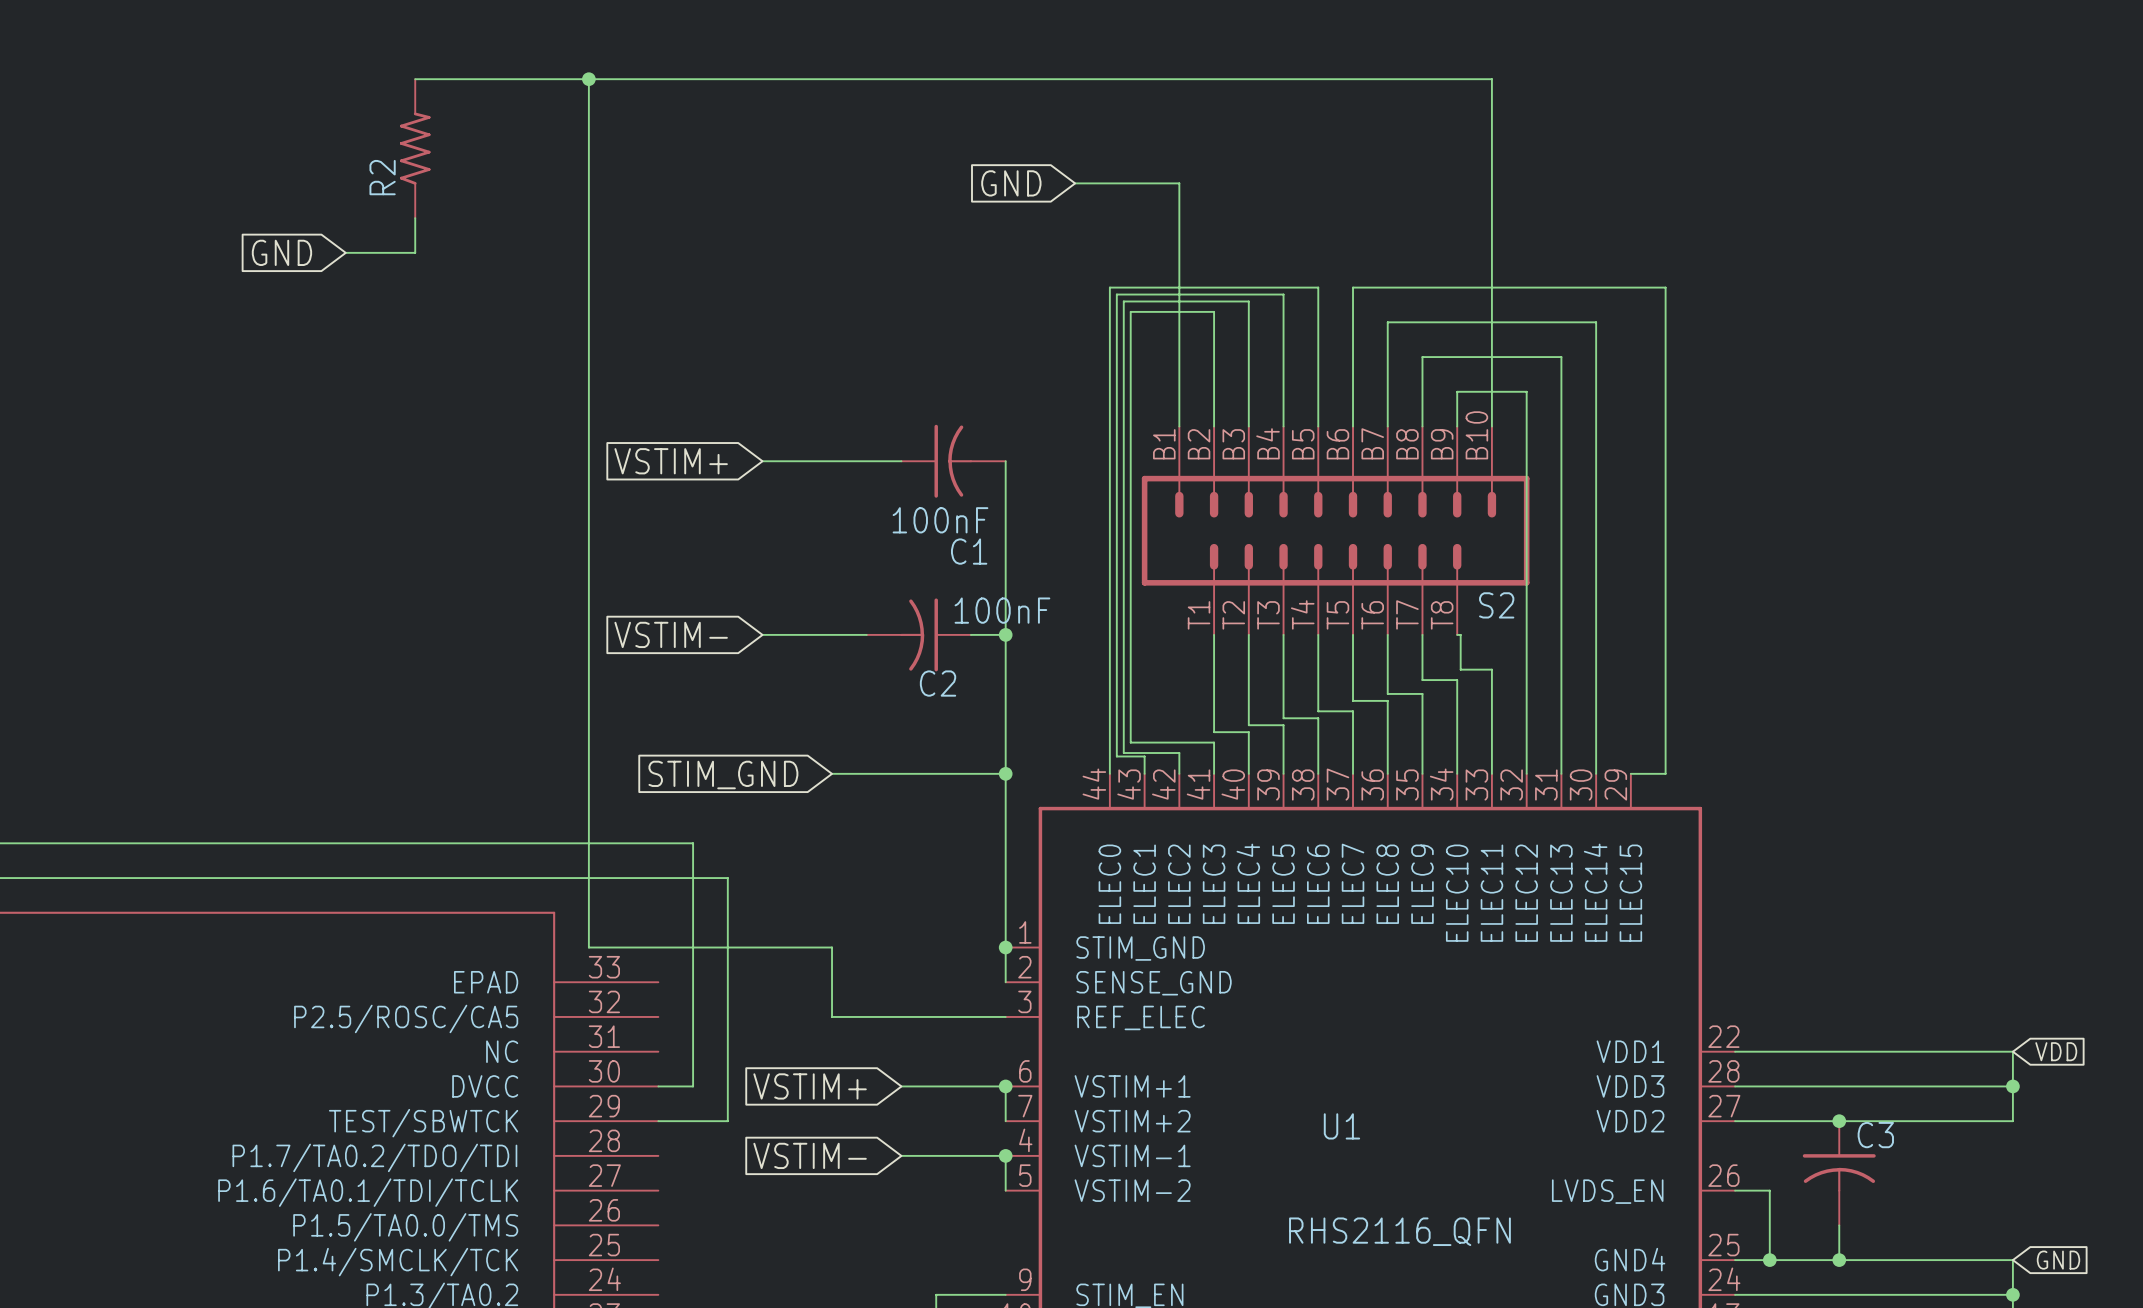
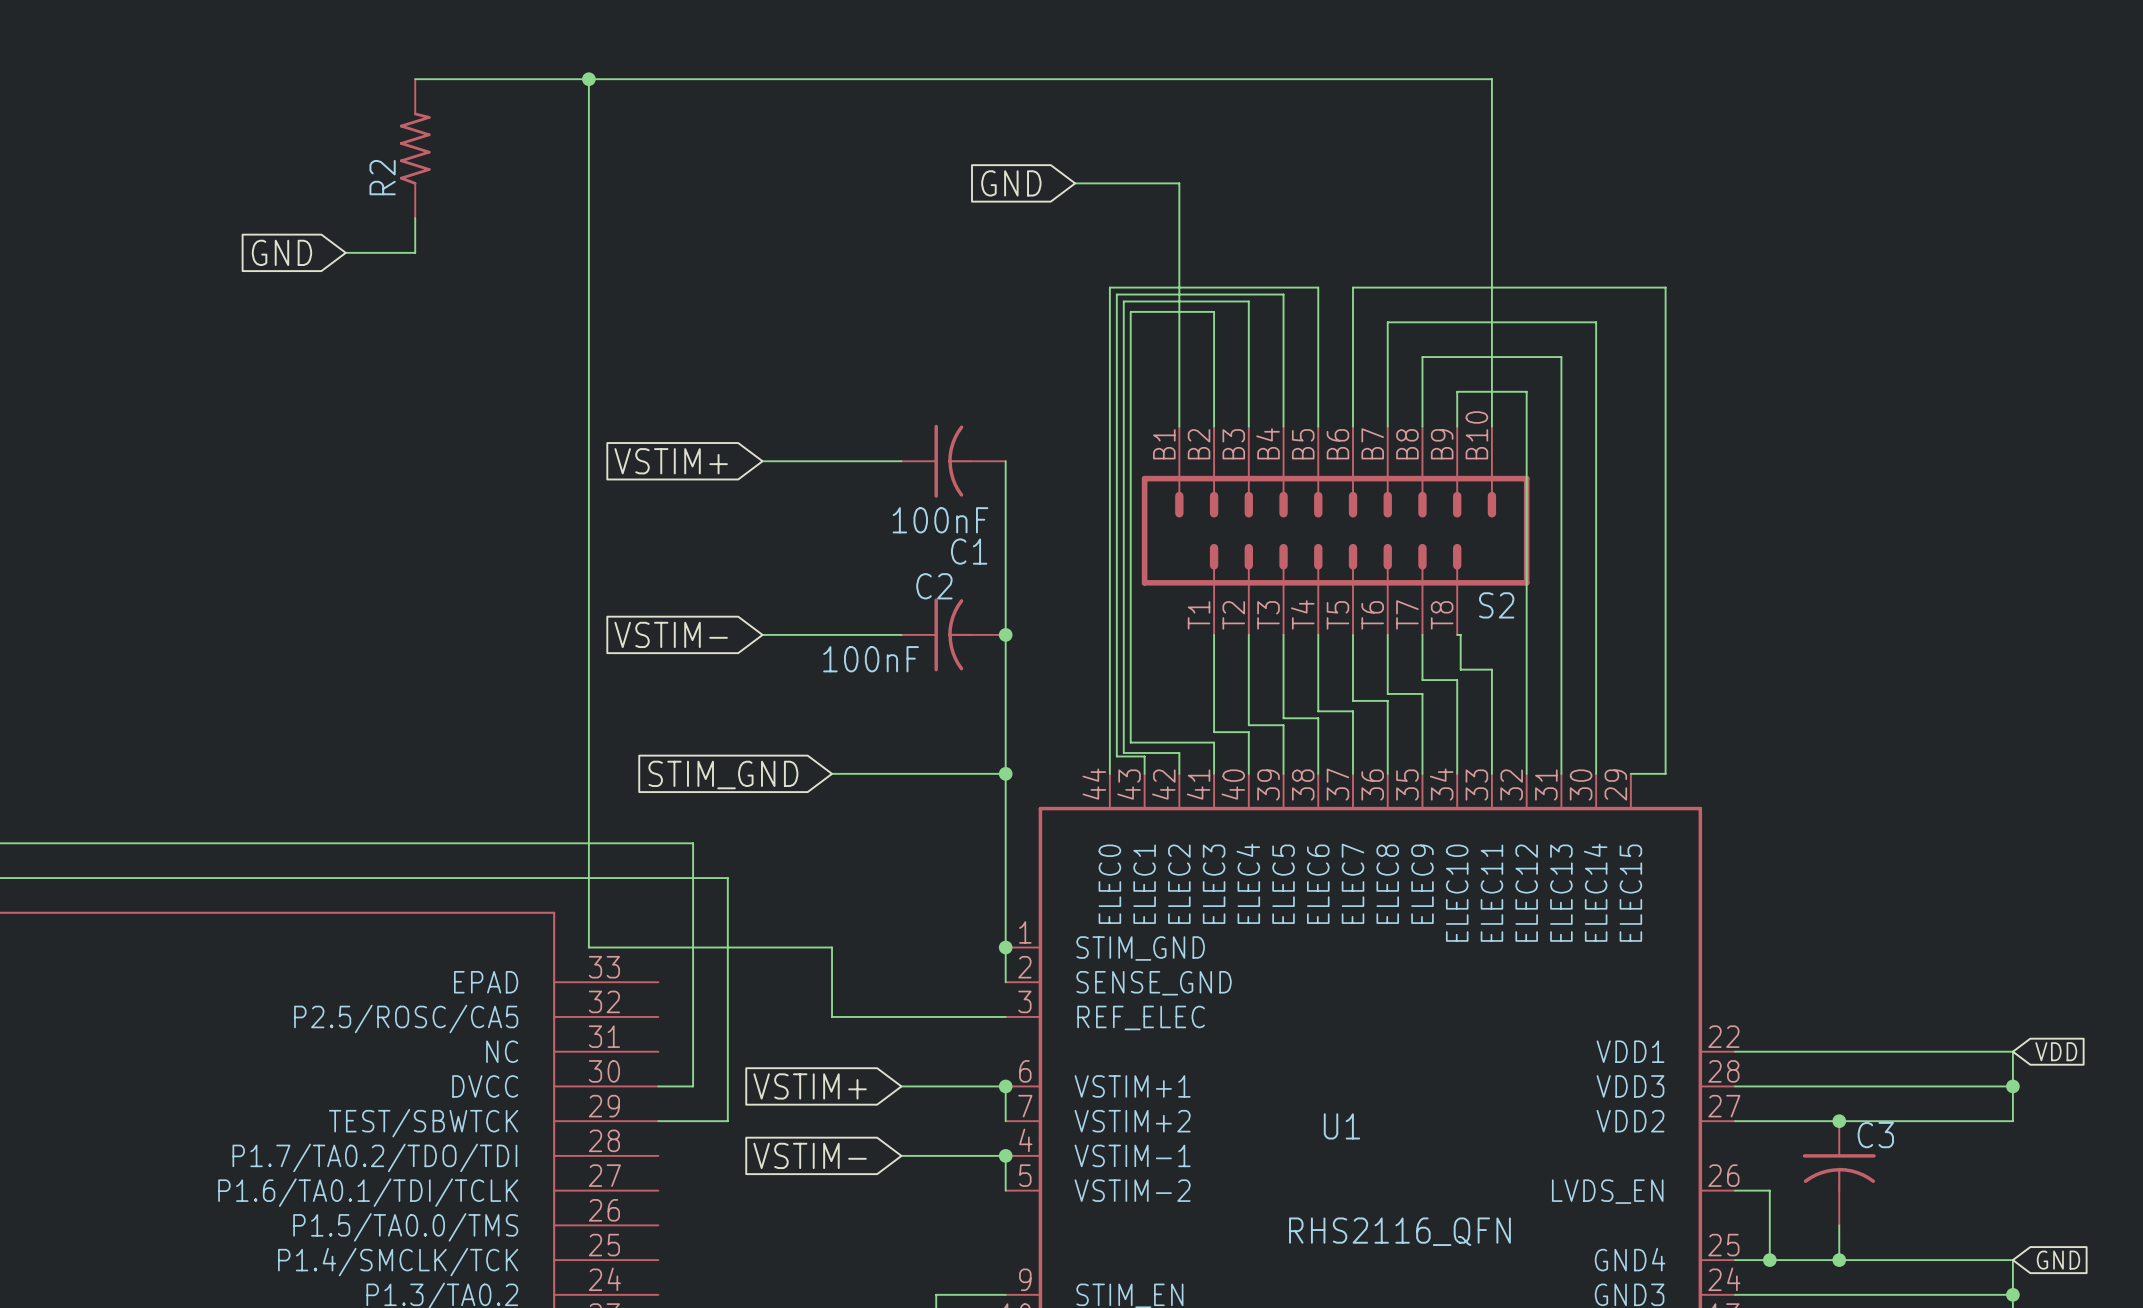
C2 rotation: 0° (919, 634) -> 180° (953, 634)

